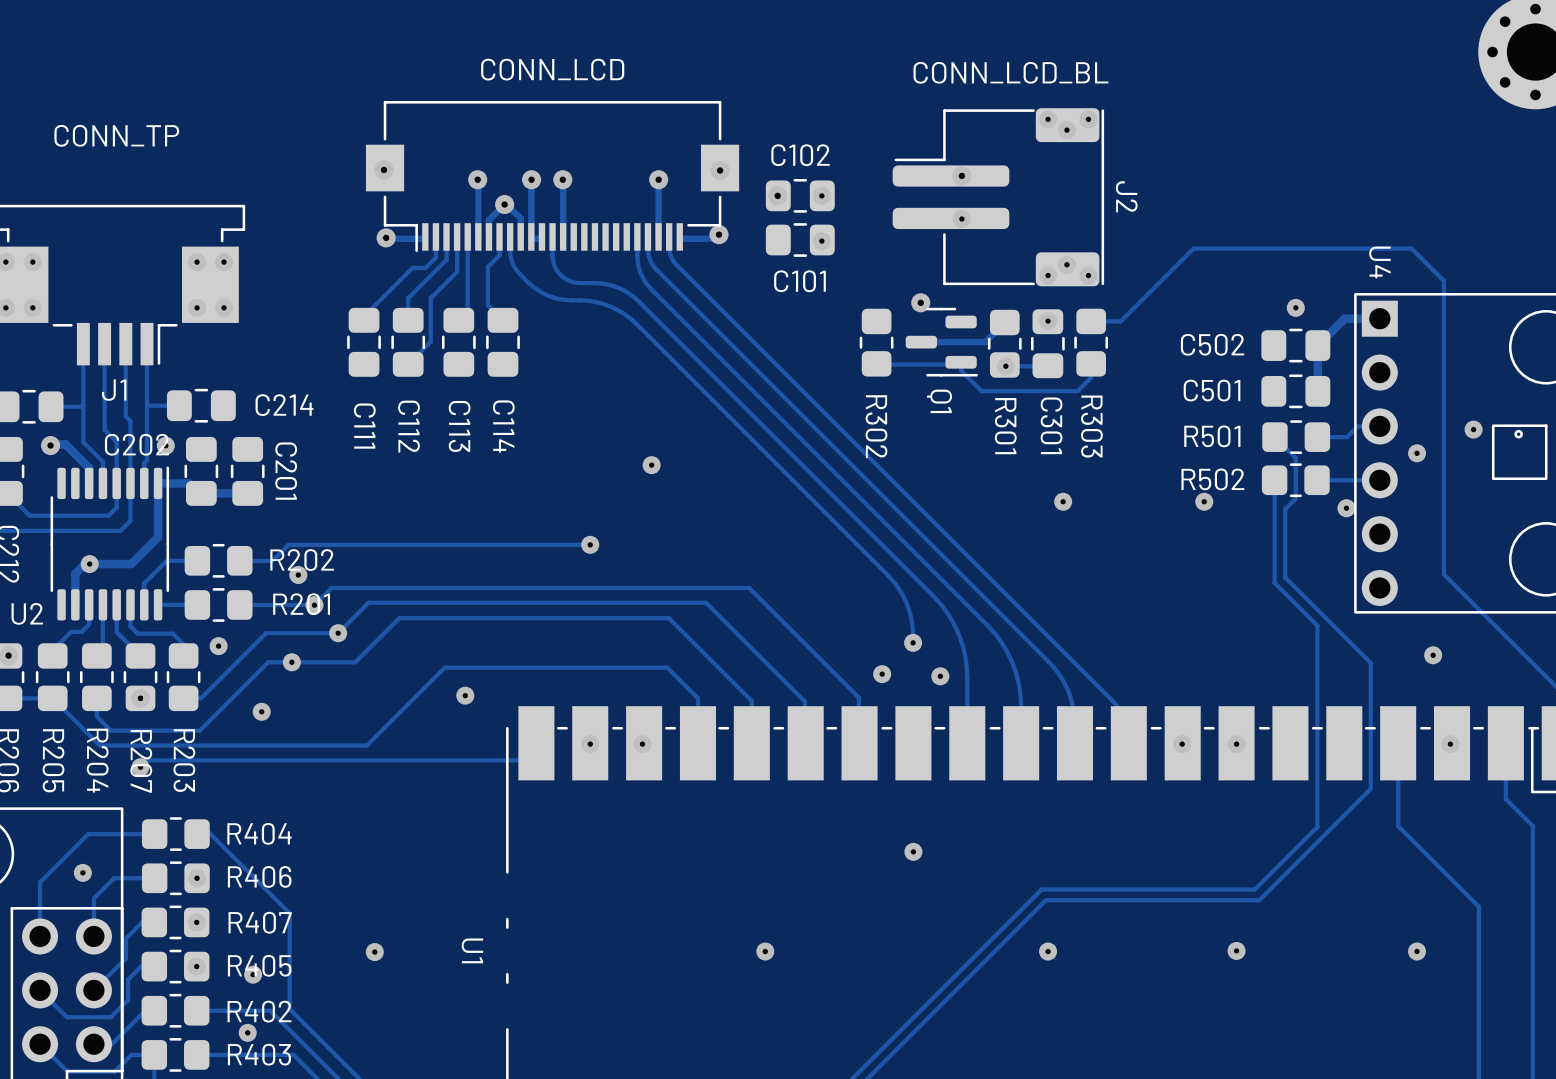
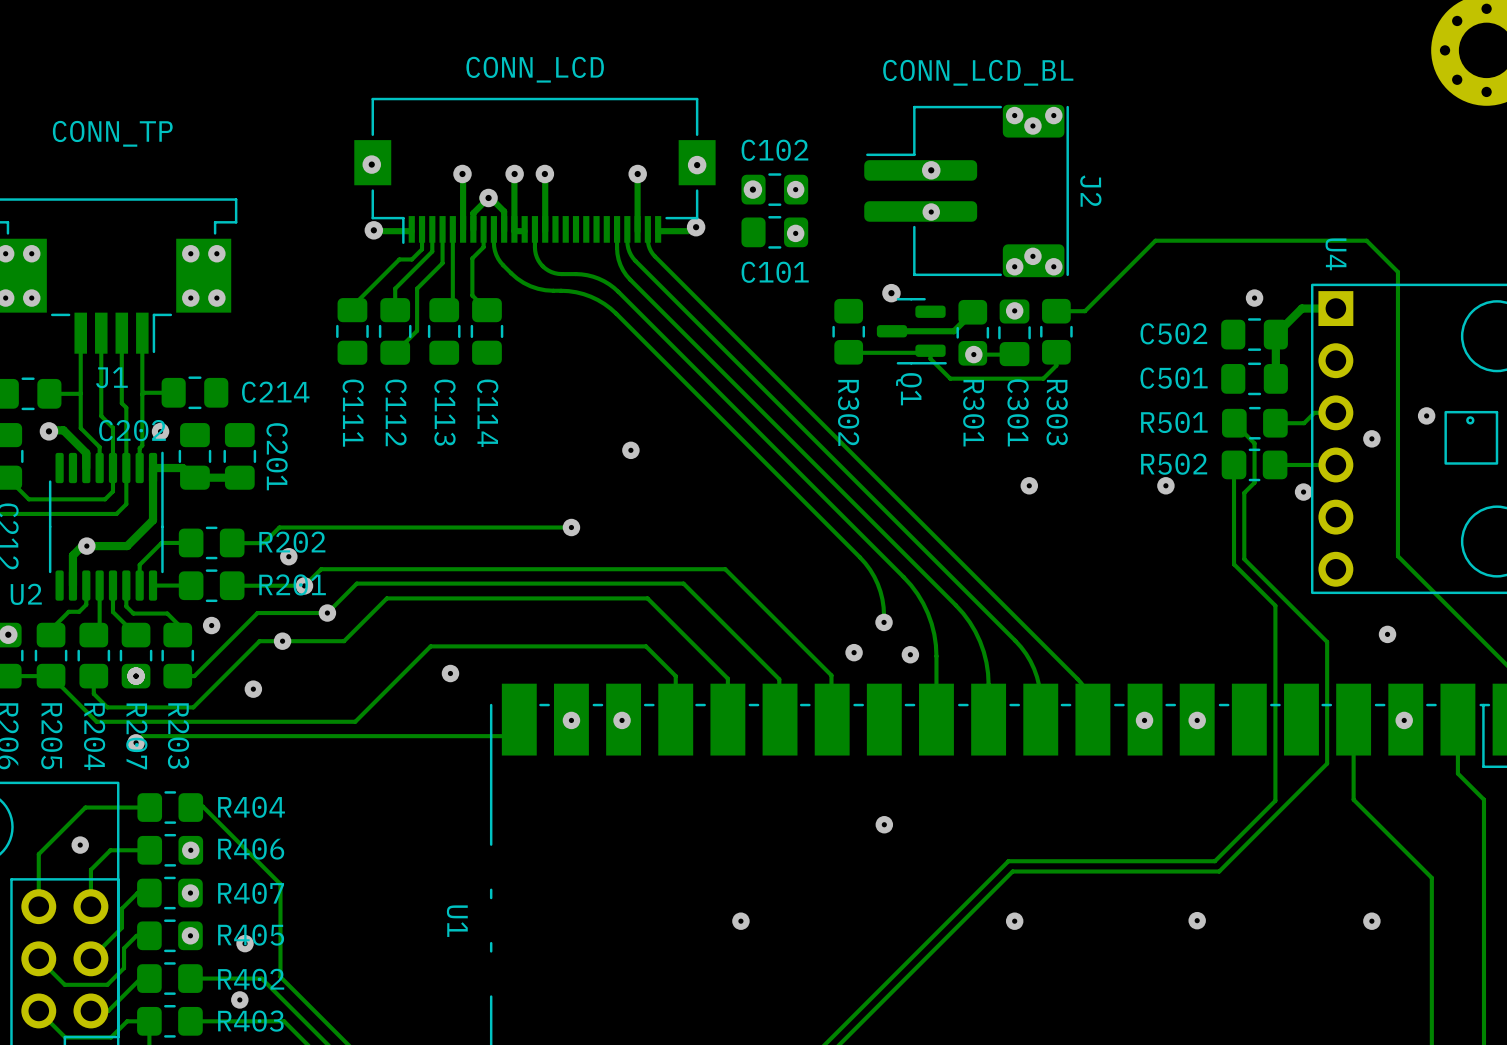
via: (374, 952) -> none

